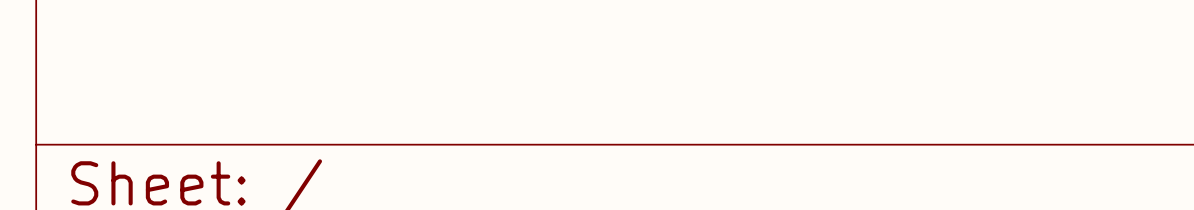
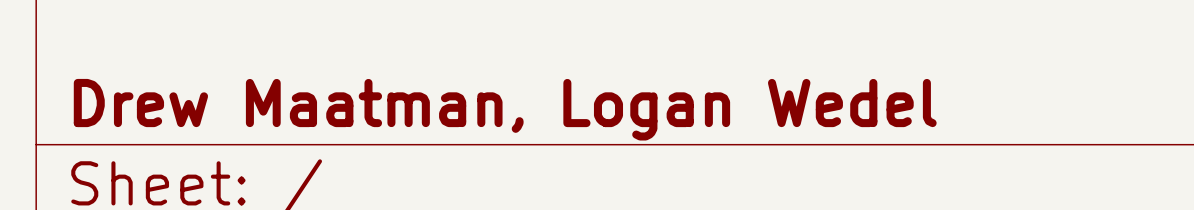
title block: none -> Drew Maatman, Logan Wedel (505, 109)

